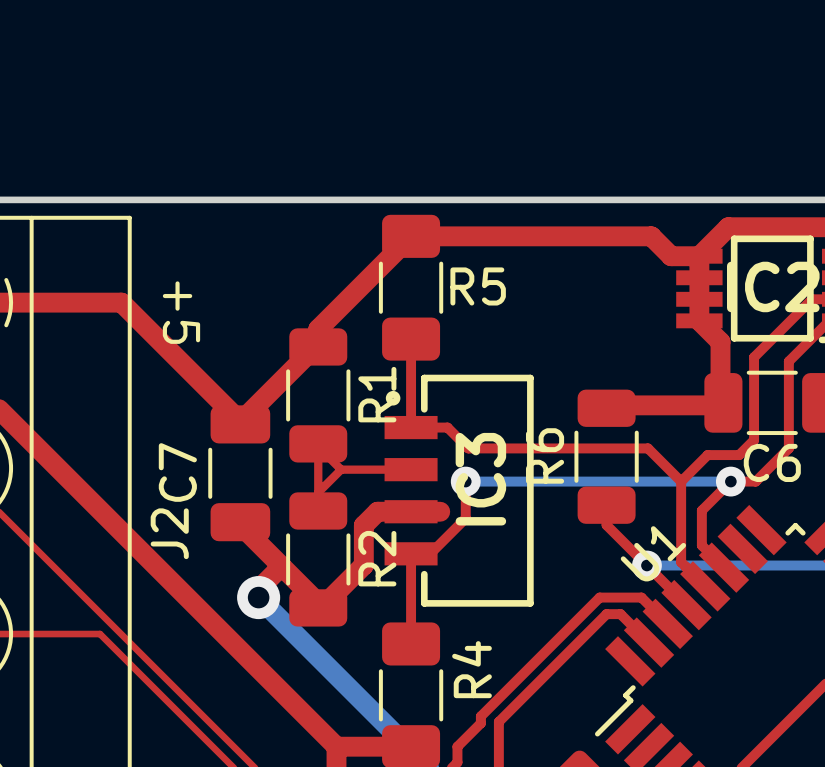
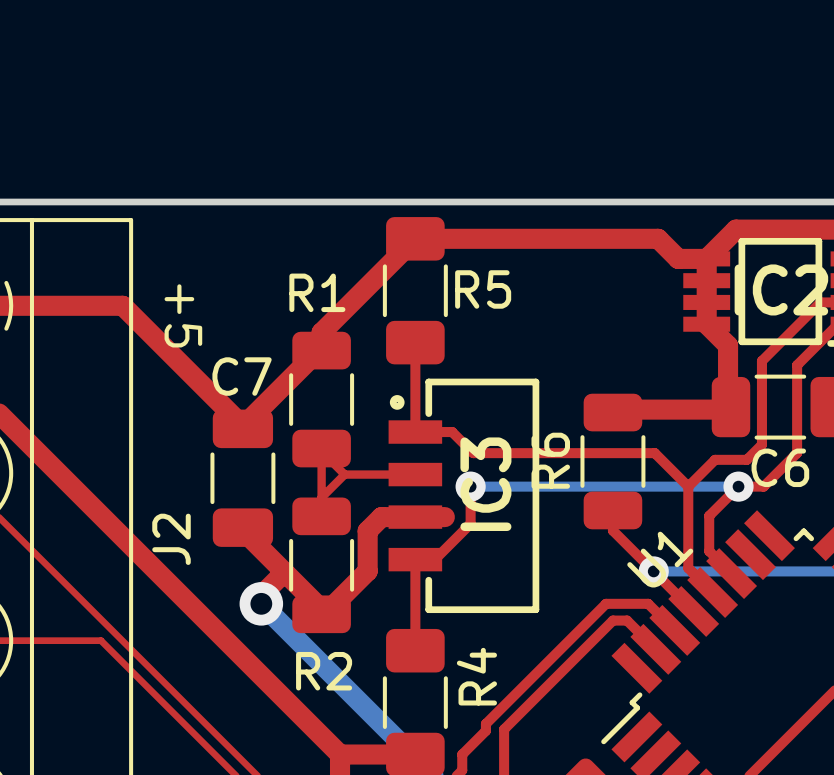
R1 name rotation: 0° (377, 394) -> 90° clockwise (317, 292)
R1 name position: R1 (377, 394) -> R1 (317, 292)
C7 name rotation: 0° (177, 472) -> 90° clockwise (242, 376)
C7 name position: C7 (177, 472) -> C7 (242, 376)
R2 name rotation: 0° (377, 558) -> 90° clockwise (324, 671)
R2 name position: R2 (377, 558) -> R2 (324, 671)

